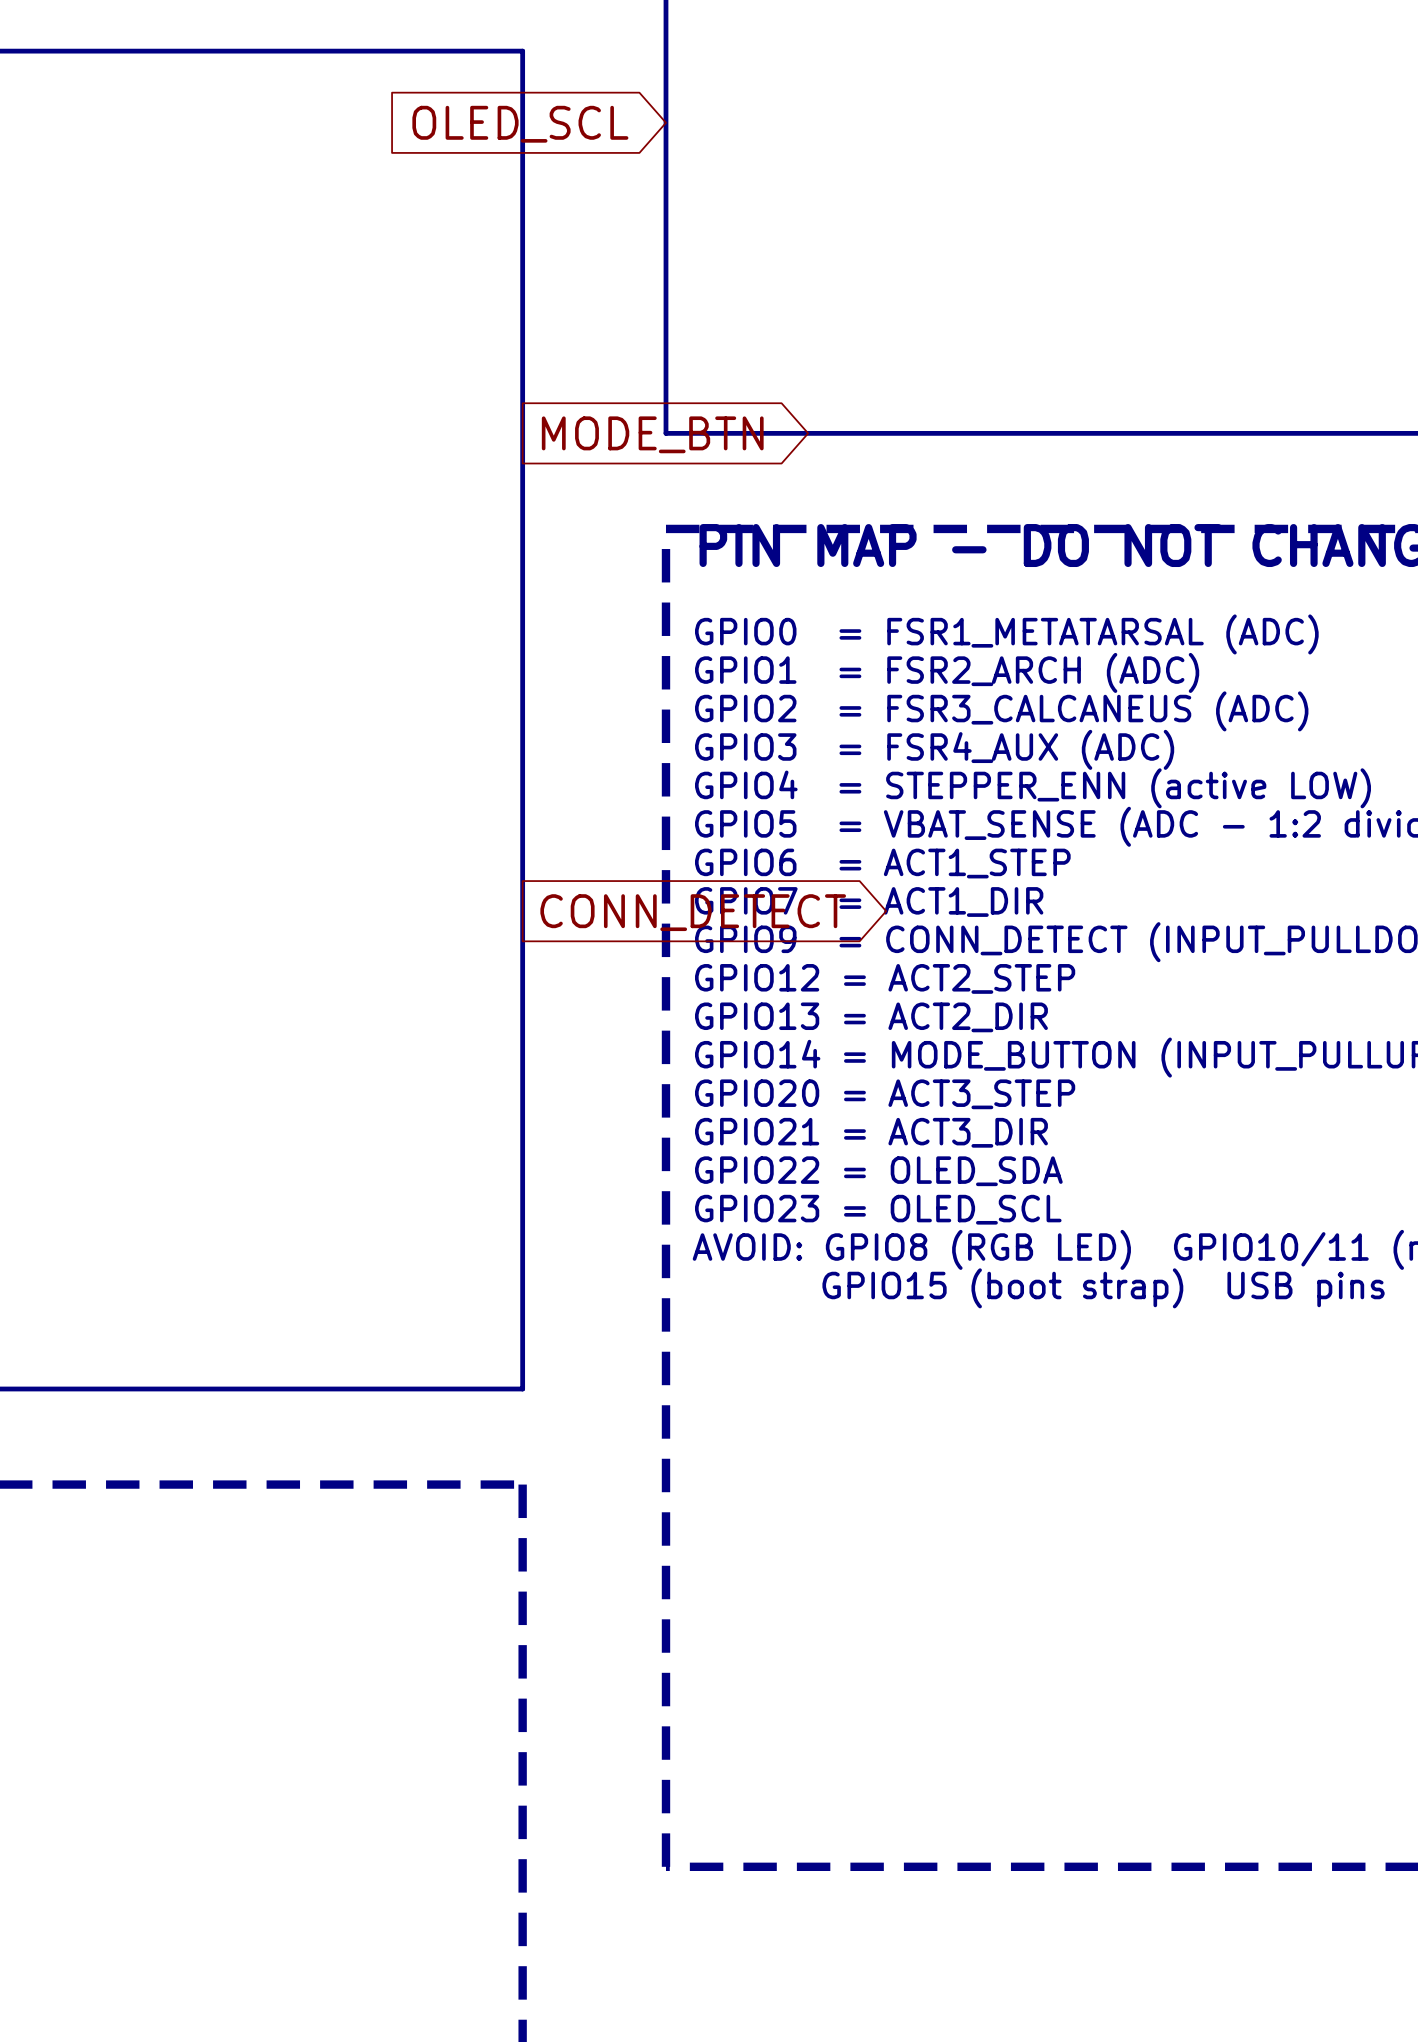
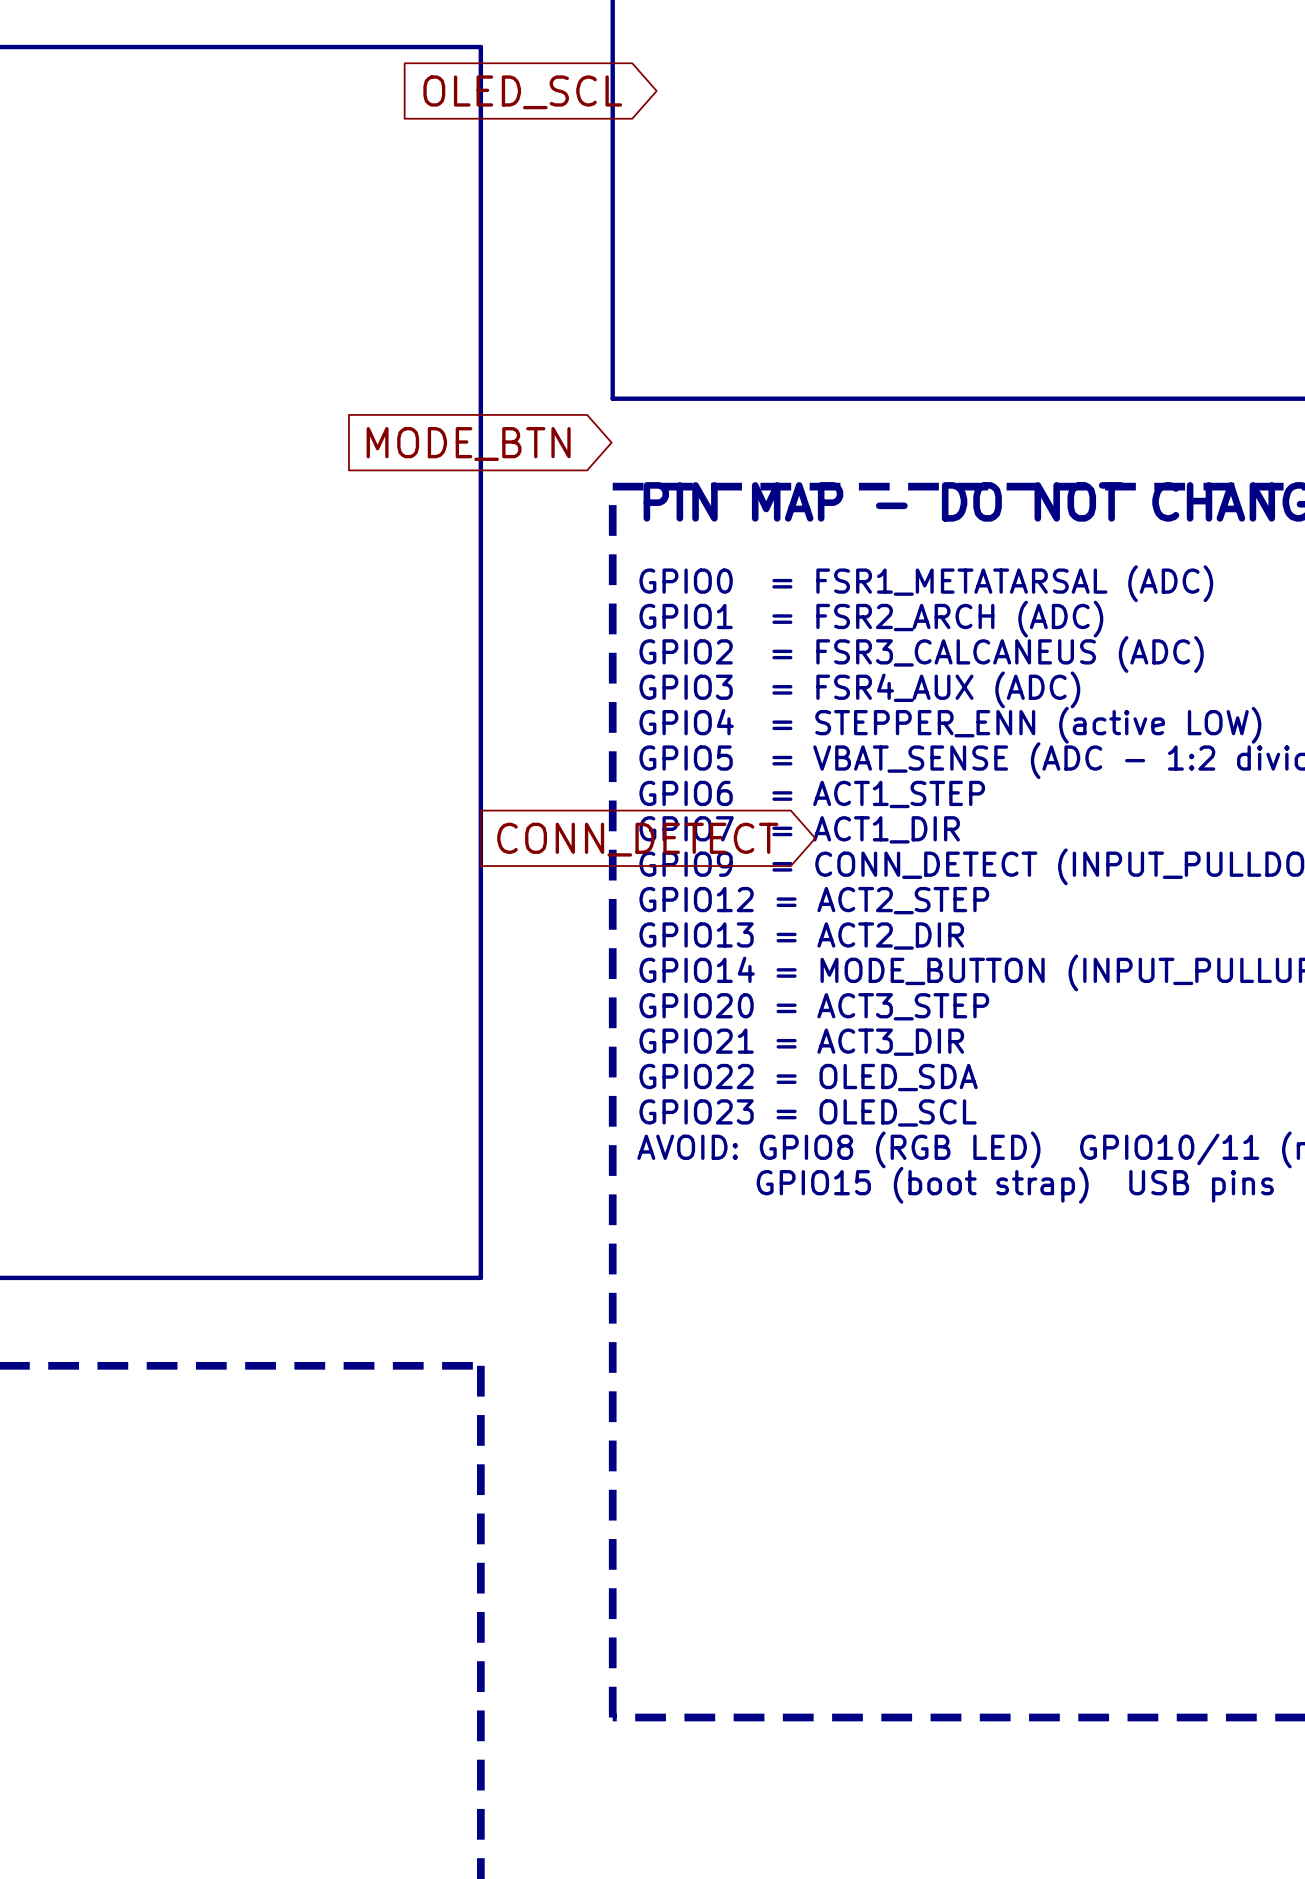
global label position: OLED_SCL (520, 124) -> OLED_SCL (522, 92)
global label position: MODE_BTN (652, 434) -> MODE_BTN (468, 444)

